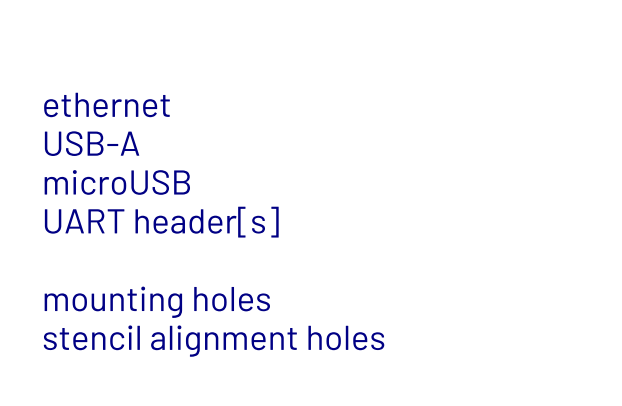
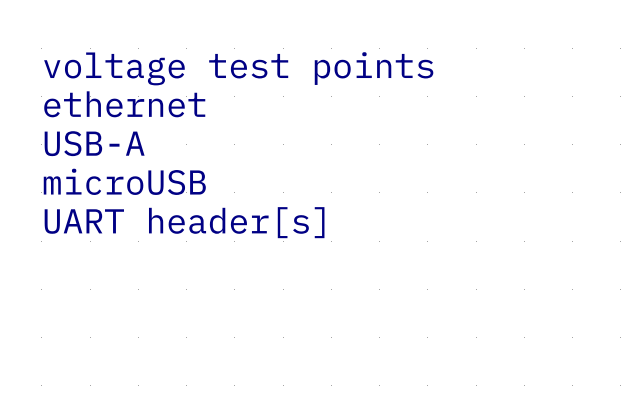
text: none -> voltage test points (238, 68)
text: mounting holes (157, 302) -> none
text: stencil alignment holes (214, 341) -> none

